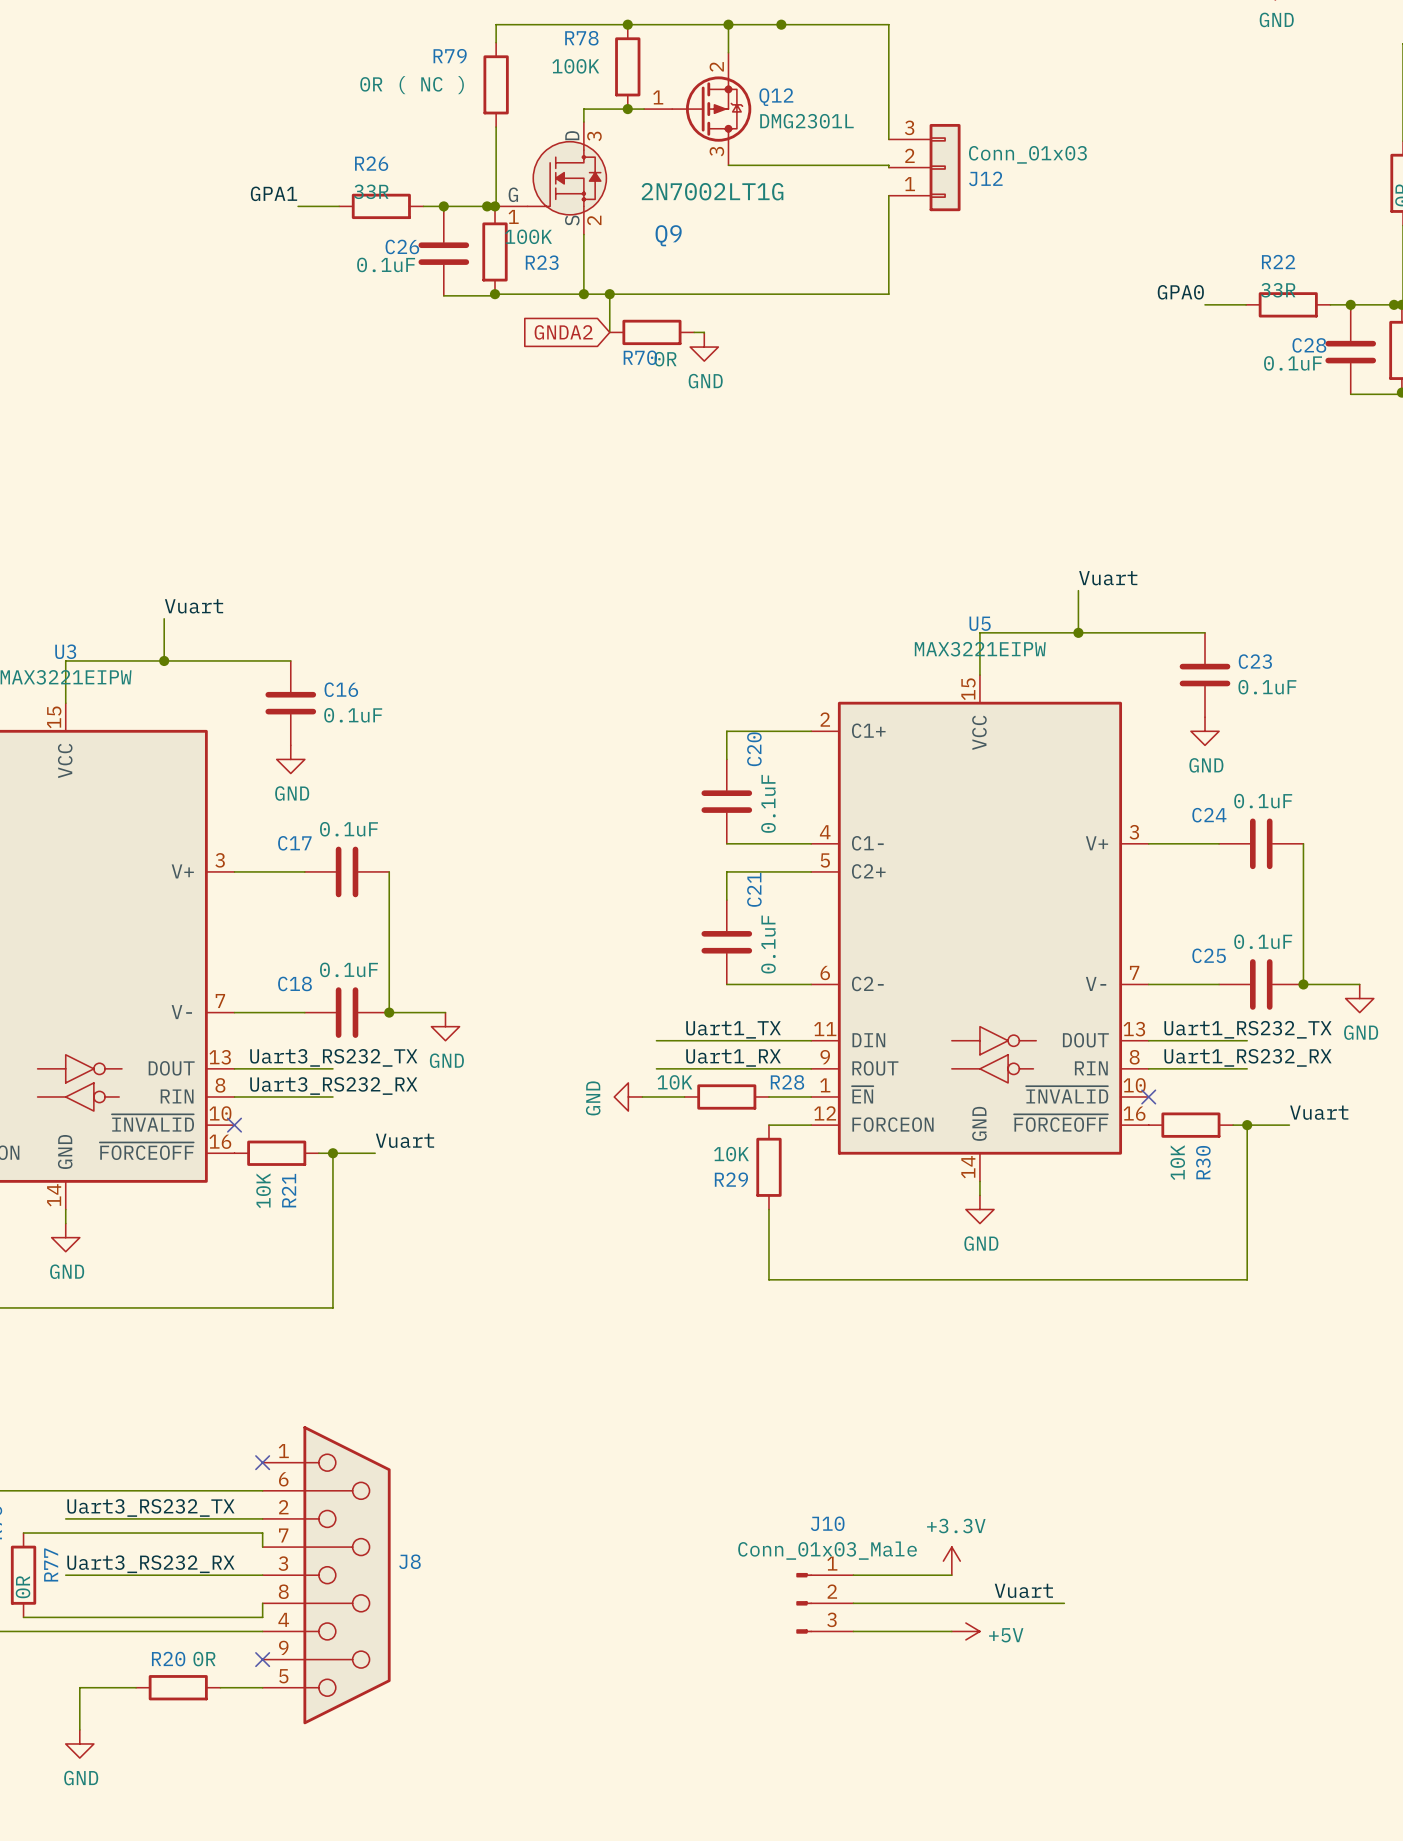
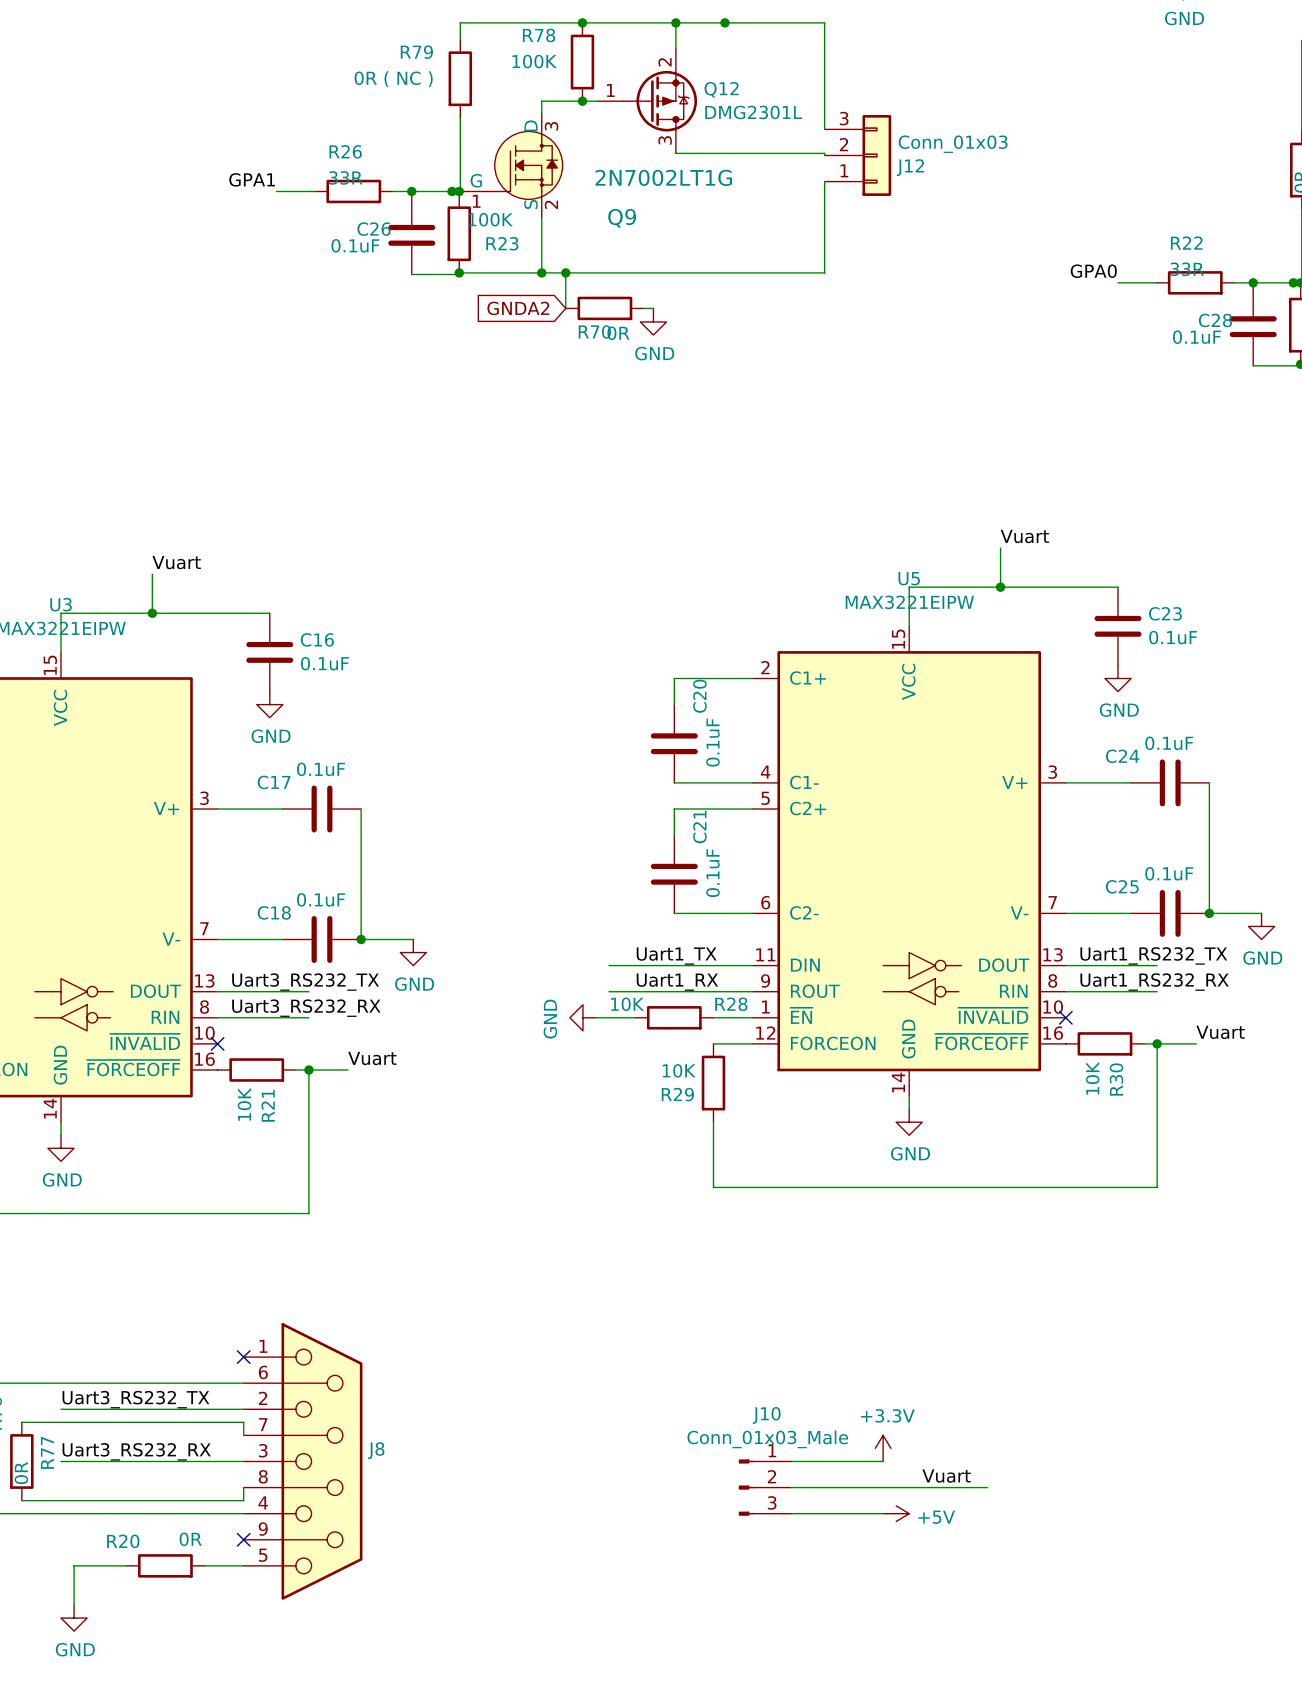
R20 name position: R20 (168, 1659) -> R20 (123, 1541)

